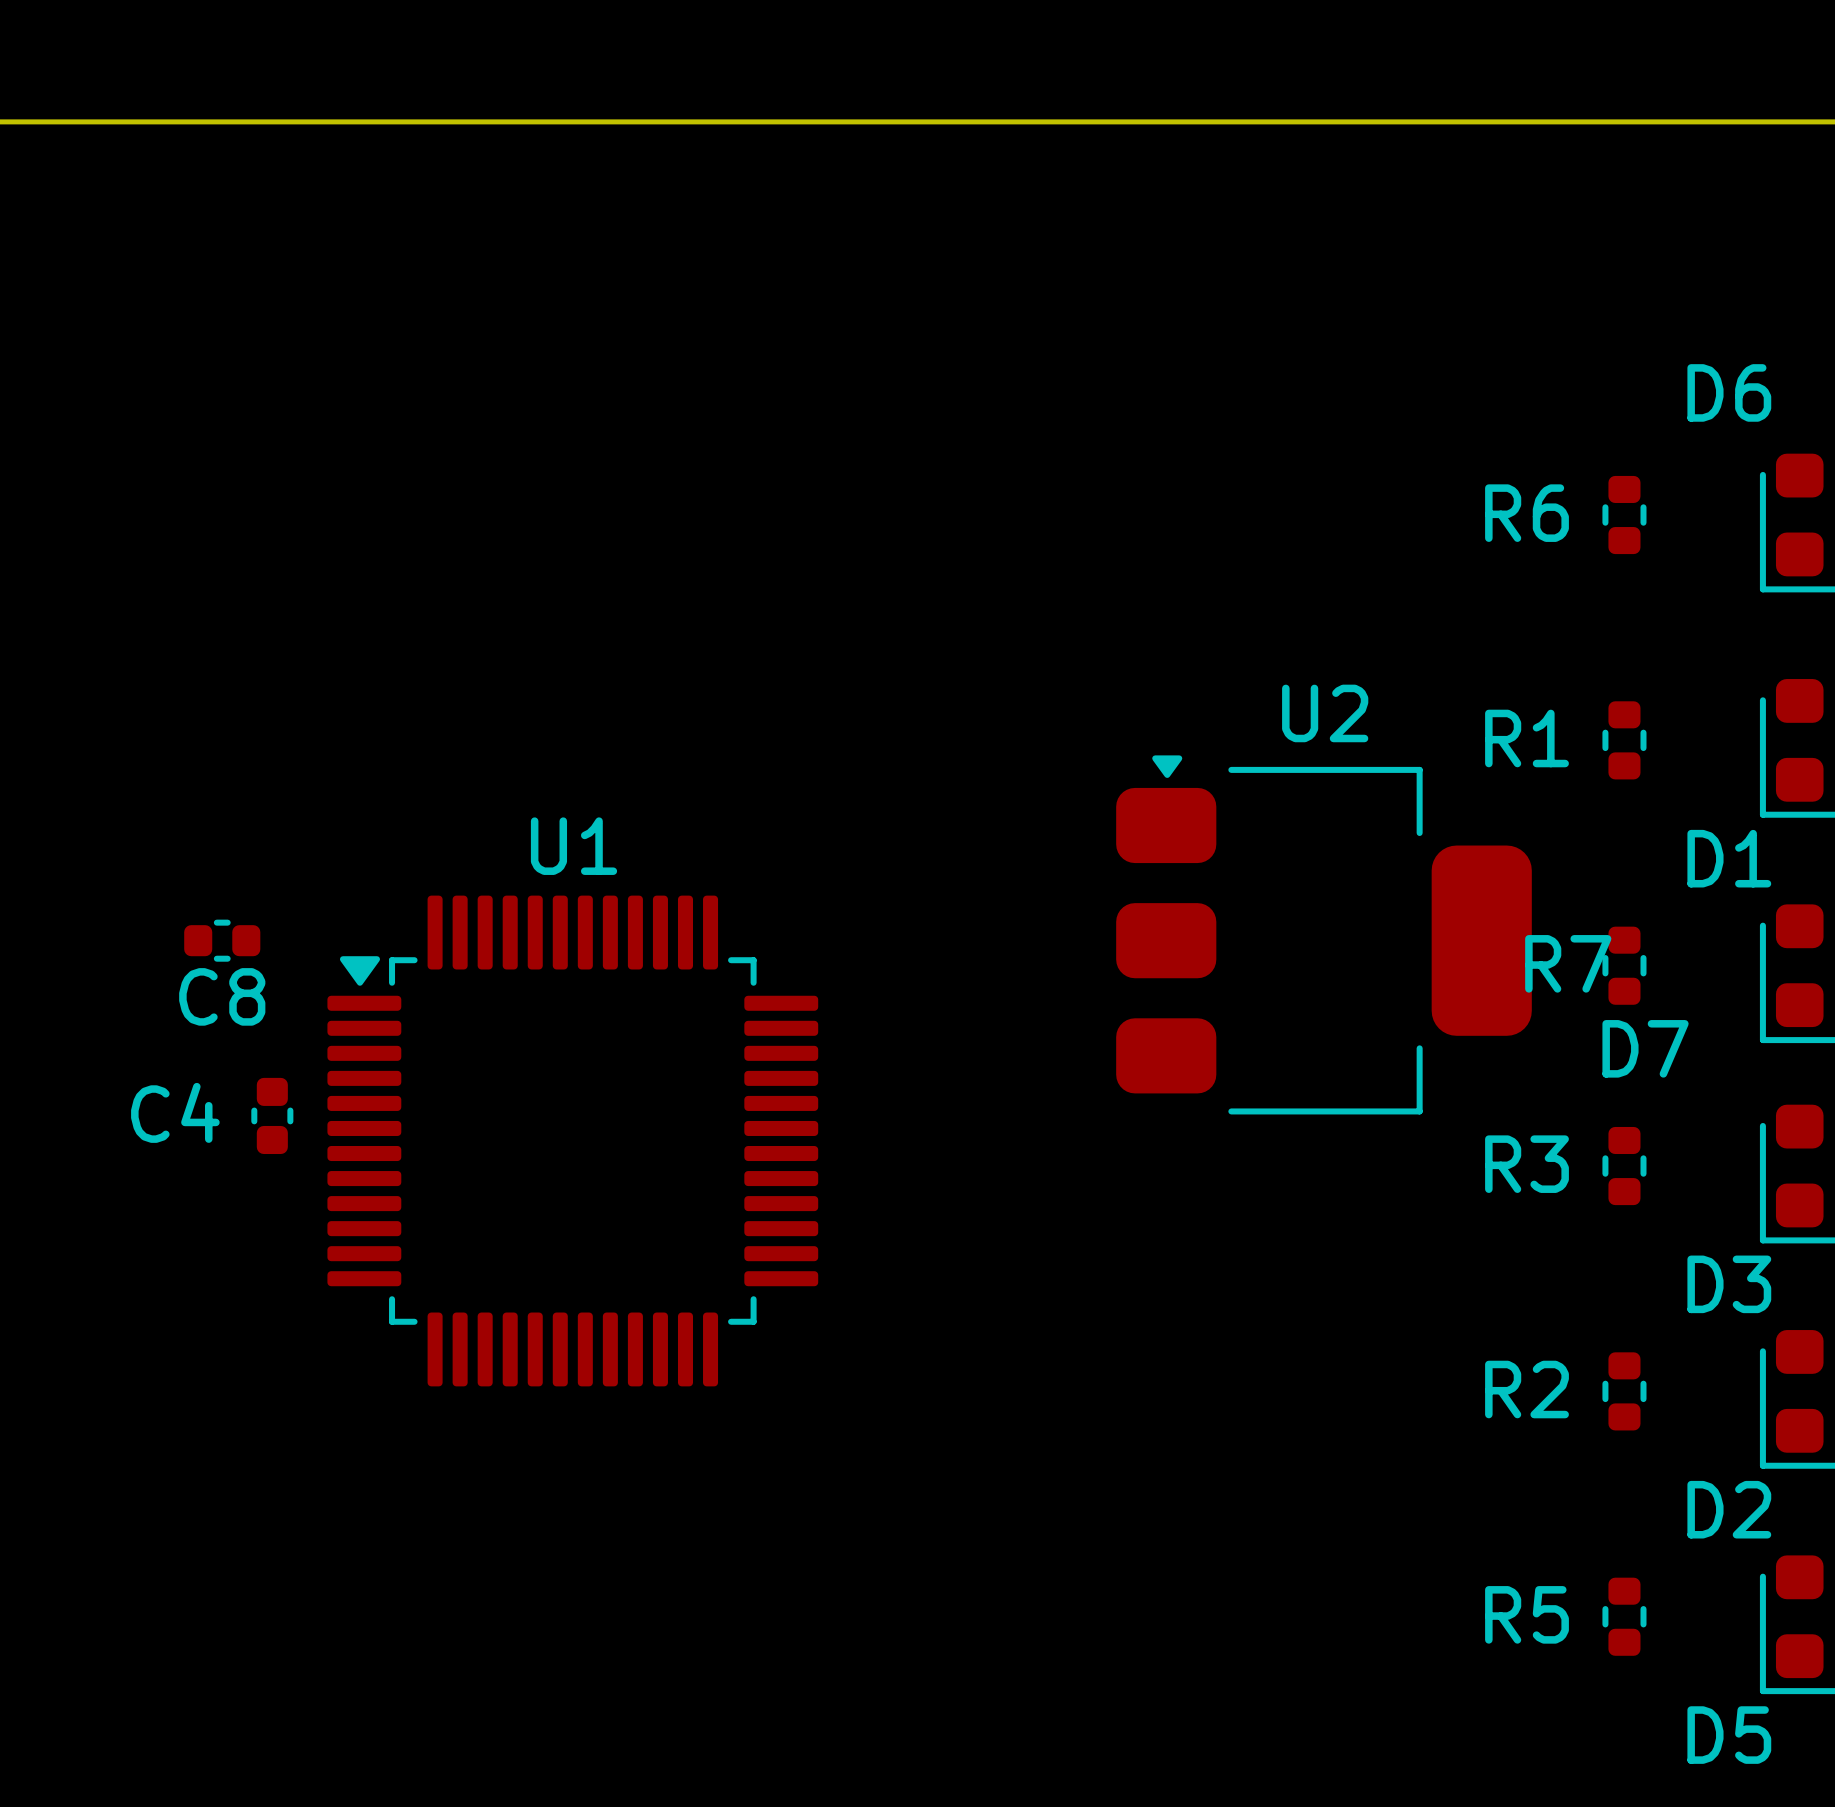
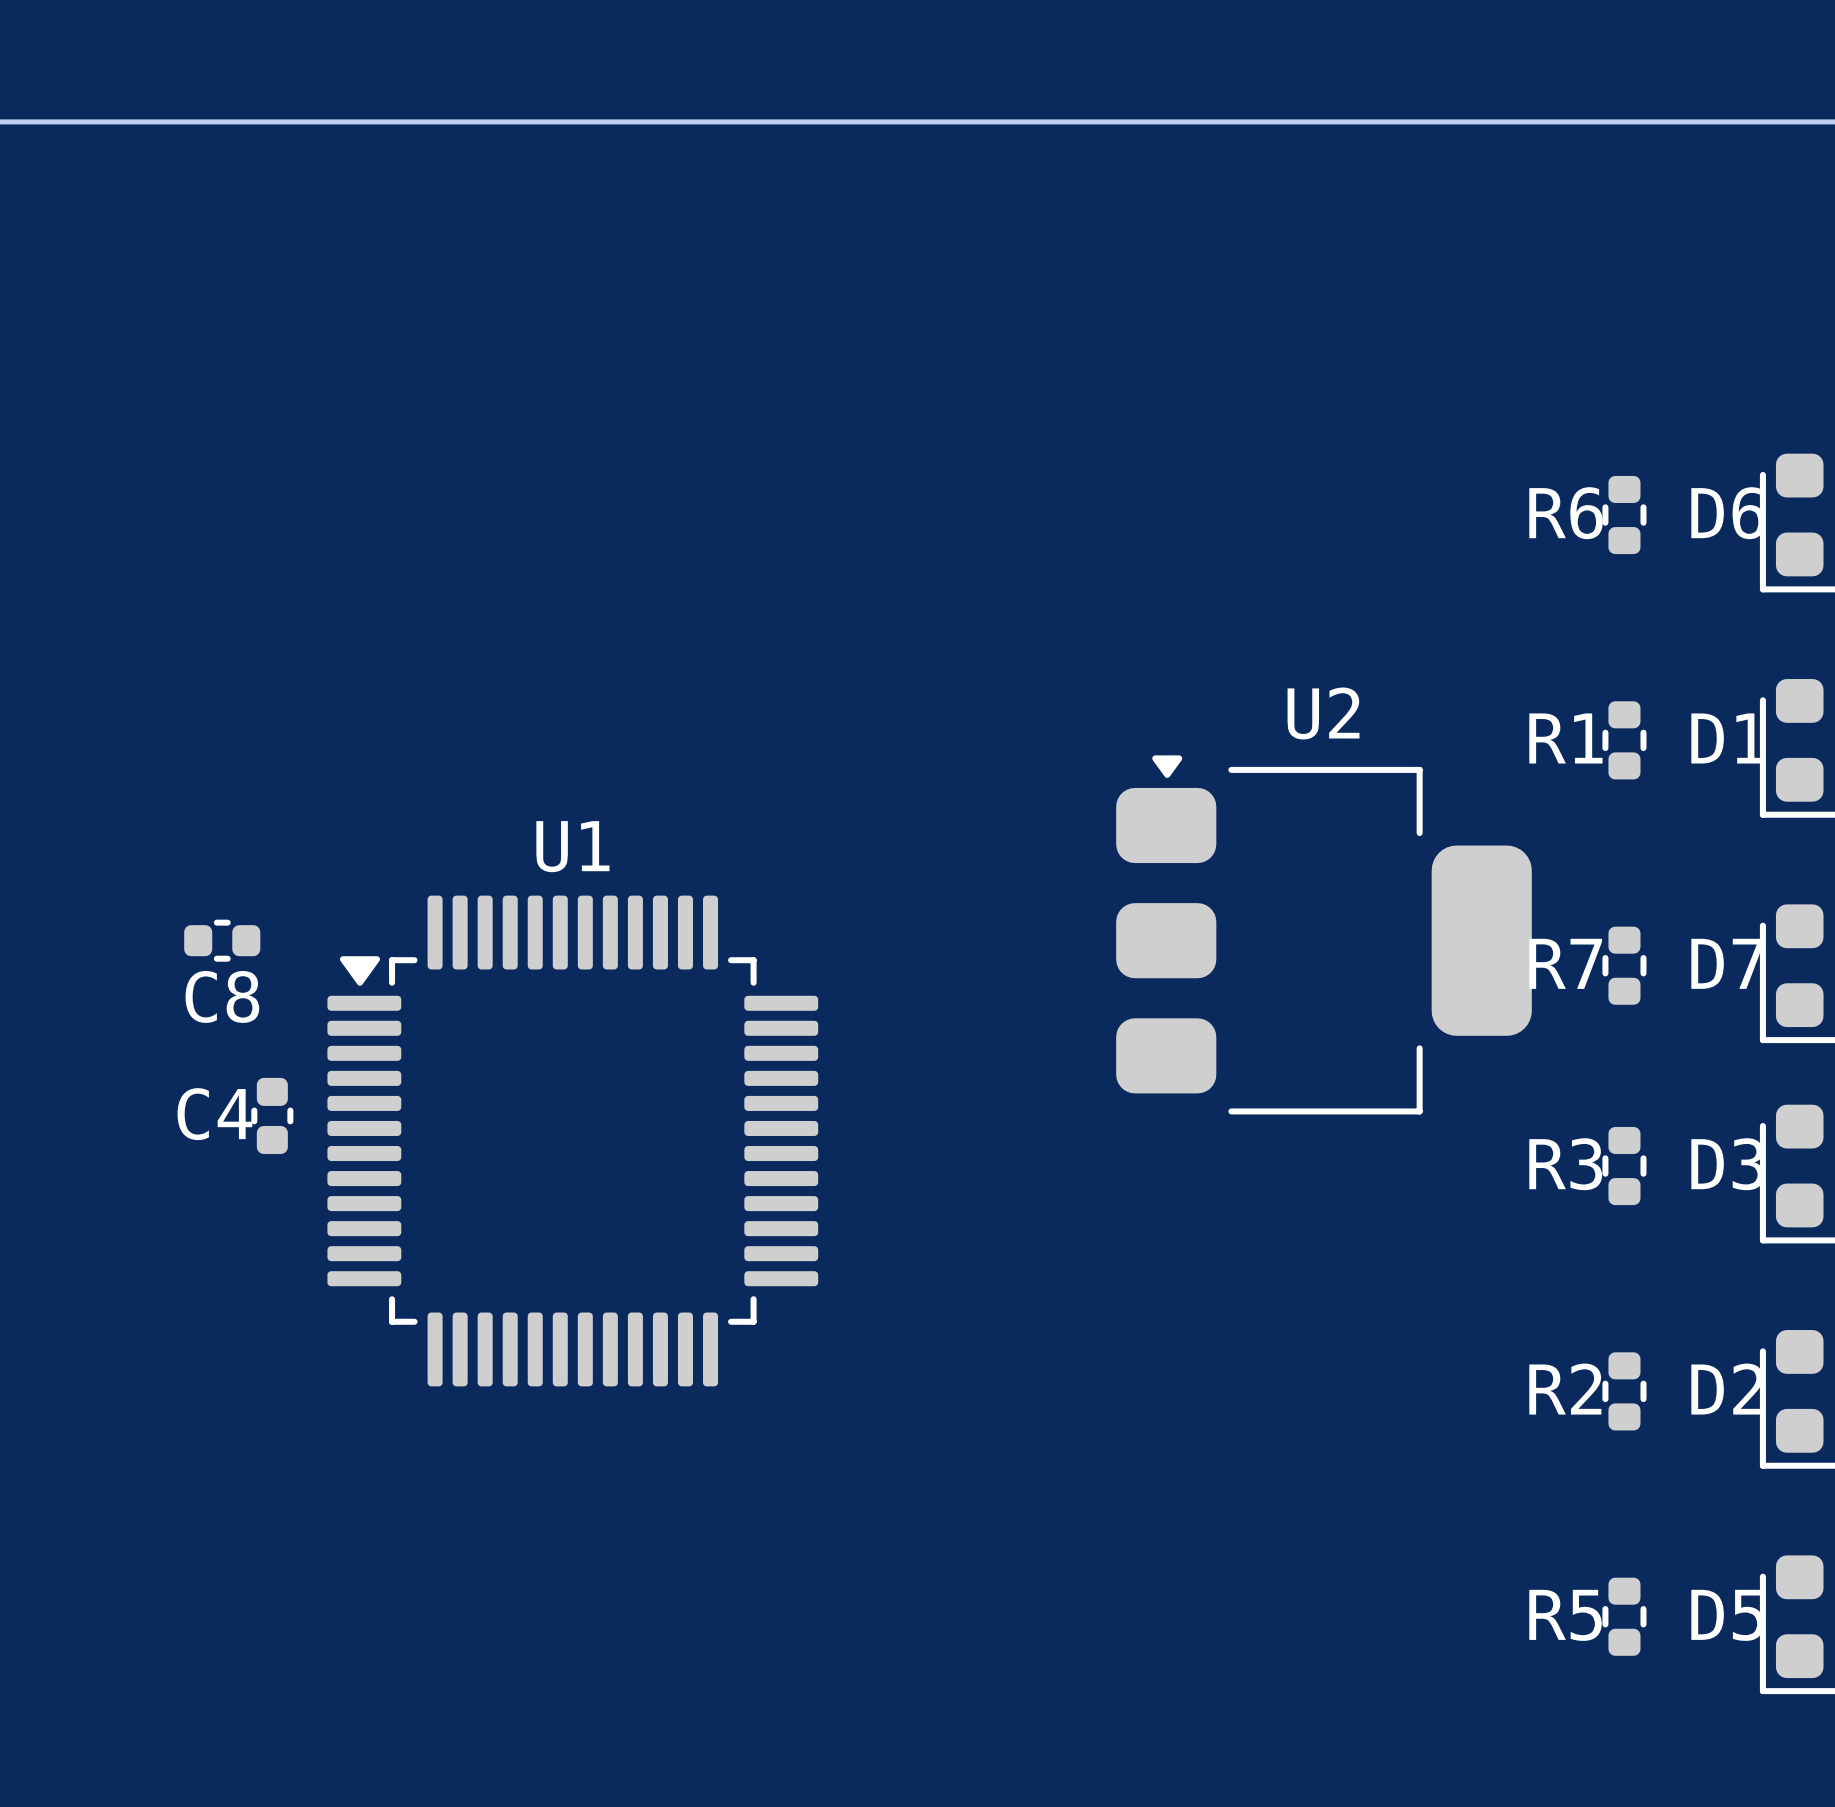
D6 name position: D6 (1729, 392) -> D6 (1728, 513)
R6 name position: R6 (1527, 513) -> R6 (1566, 513)
R1 name position: R1 (1527, 738) -> R1 (1565, 738)
D1 name position: D1 (1729, 858) -> D1 (1728, 738)
D7 name position: D7 (1645, 1048) -> D7 (1727, 963)
C4 name position: C4 (175, 1112) -> C4 (214, 1114)
R3 name position: R3 (1527, 1164) -> R3 (1565, 1164)
D3 name position: D3 (1729, 1284) -> D3 (1727, 1164)
R2 name position: R2 (1527, 1389) -> R2 (1565, 1389)
D2 name position: D2 (1729, 1509) -> D2 (1727, 1389)
R5 name position: R5 (1527, 1614) -> R5 (1565, 1615)
D5 name position: D5 (1729, 1735) -> D5 (1727, 1615)

